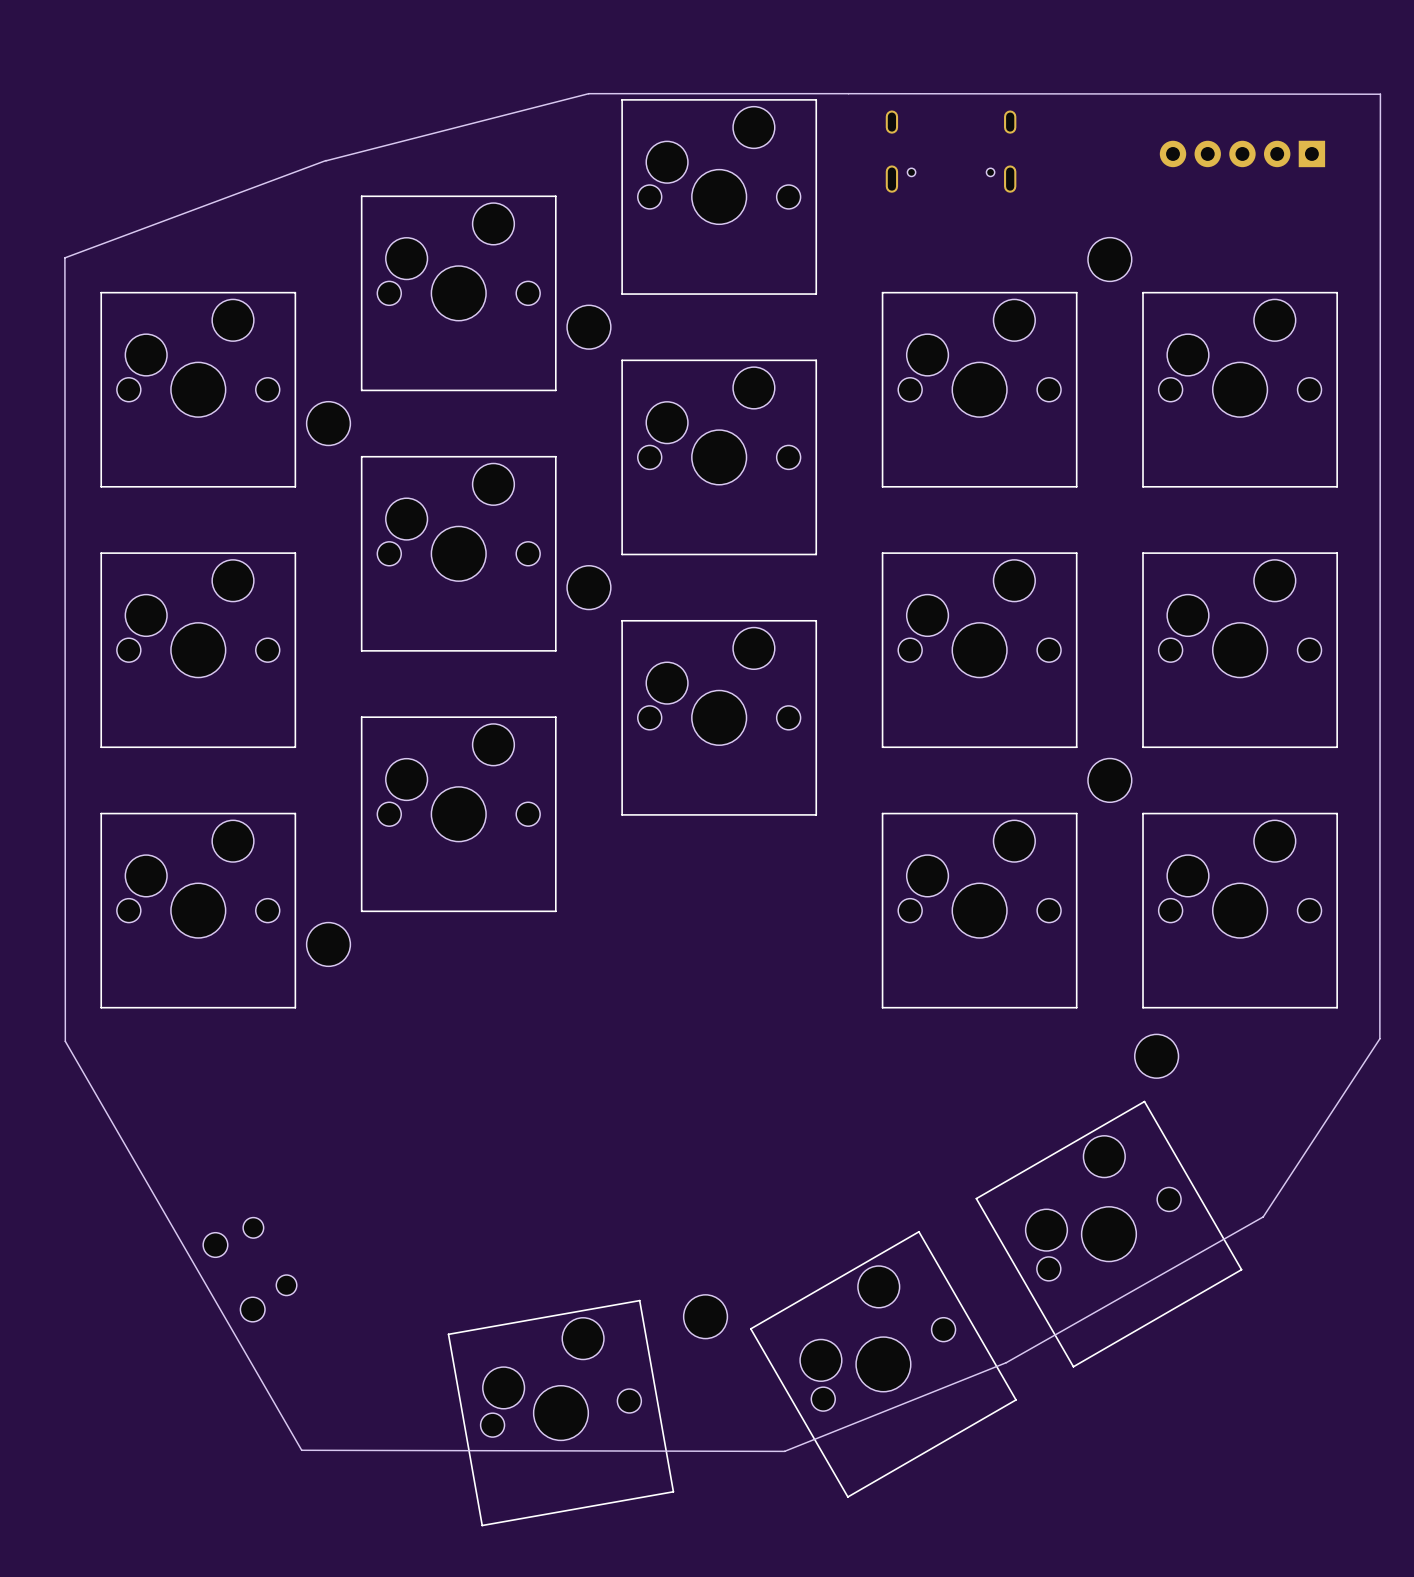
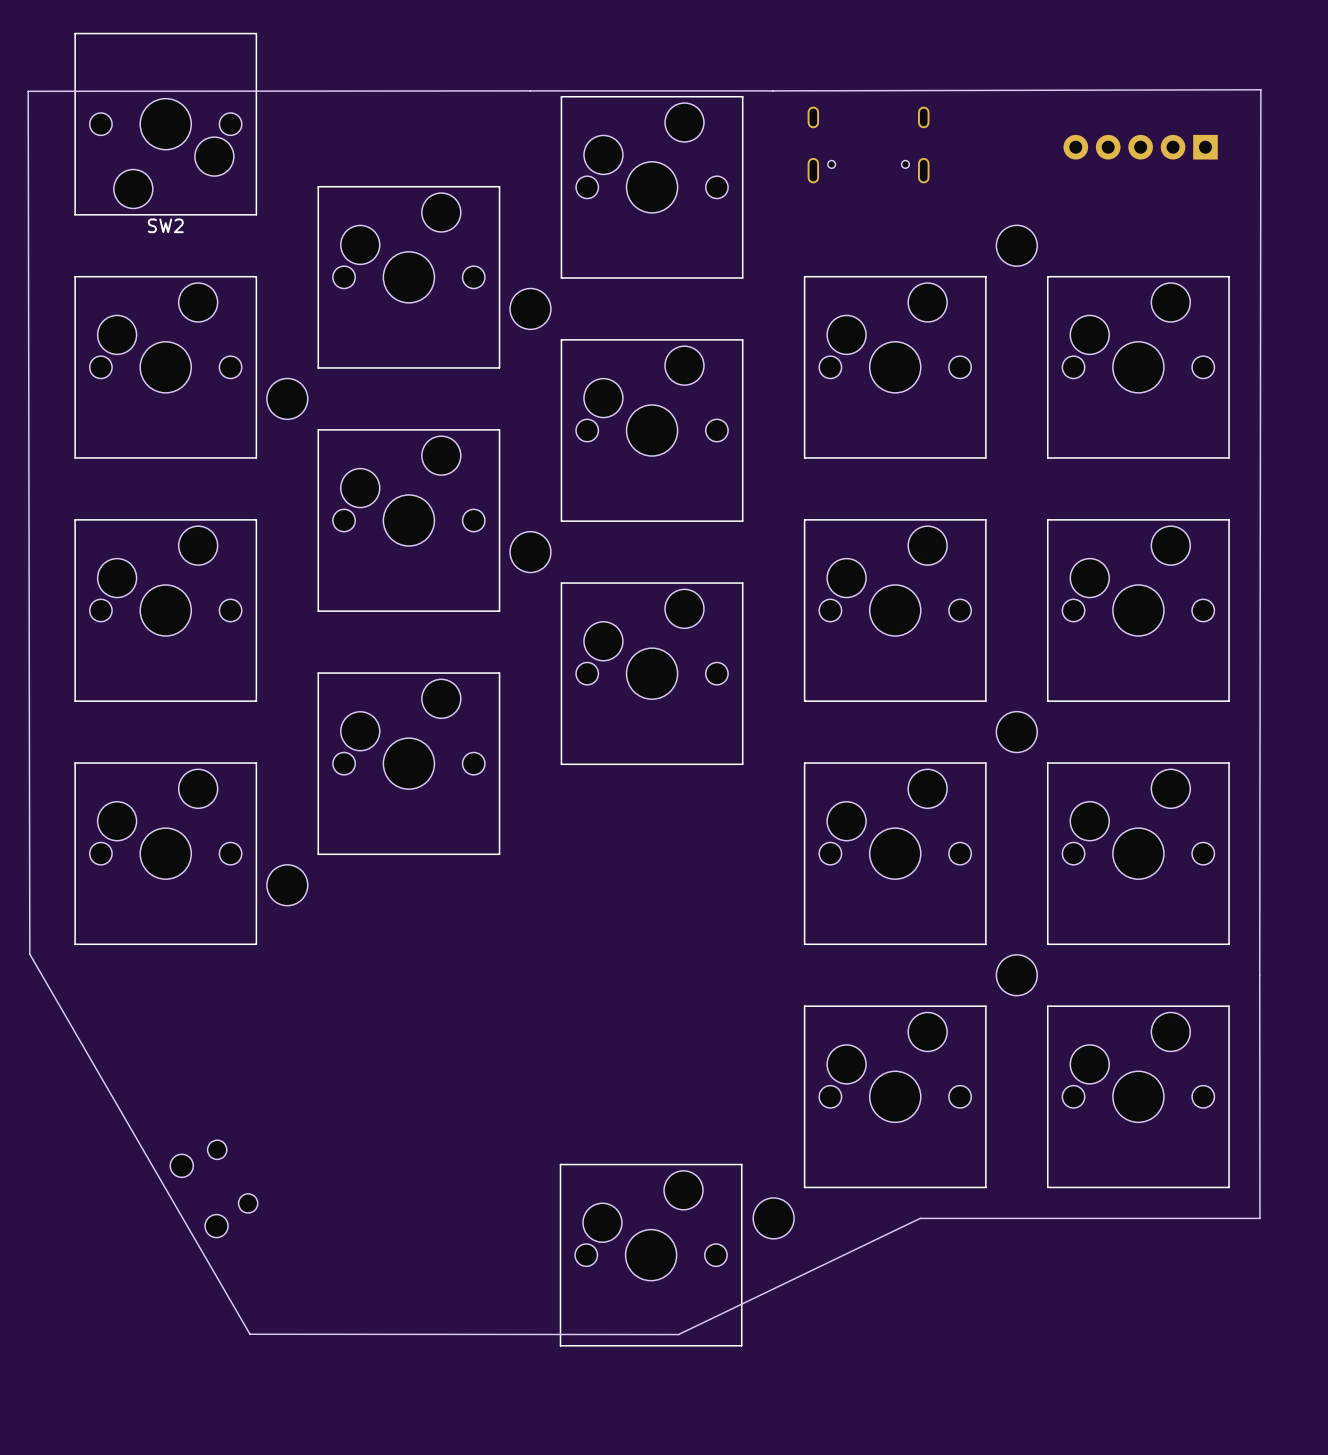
board edge: (848, 93) (1380, 94) (1379, 1038) (1263, 1216) (1006, 1362) (784, 1451) (301, 1450) (65, 1041) (64, 257) (325, 160) (588, 93) -> (772, 90) (1260, 89) (1259, 1218) (920, 1218) (678, 1334) (249, 1334) (29, 954) (28, 91) (530, 90)
SW2: none -> (165, 124)
part position: (1156, 1056) -> (1016, 975)
part: none -> (895, 1096)
part: none -> (1138, 1096)
part: (1108, 1234) -> none
part position: (705, 1316) -> (773, 1218)
part: none -> (651, 1255)
part: (883, 1364) -> none
part: (560, 1413) -> none

